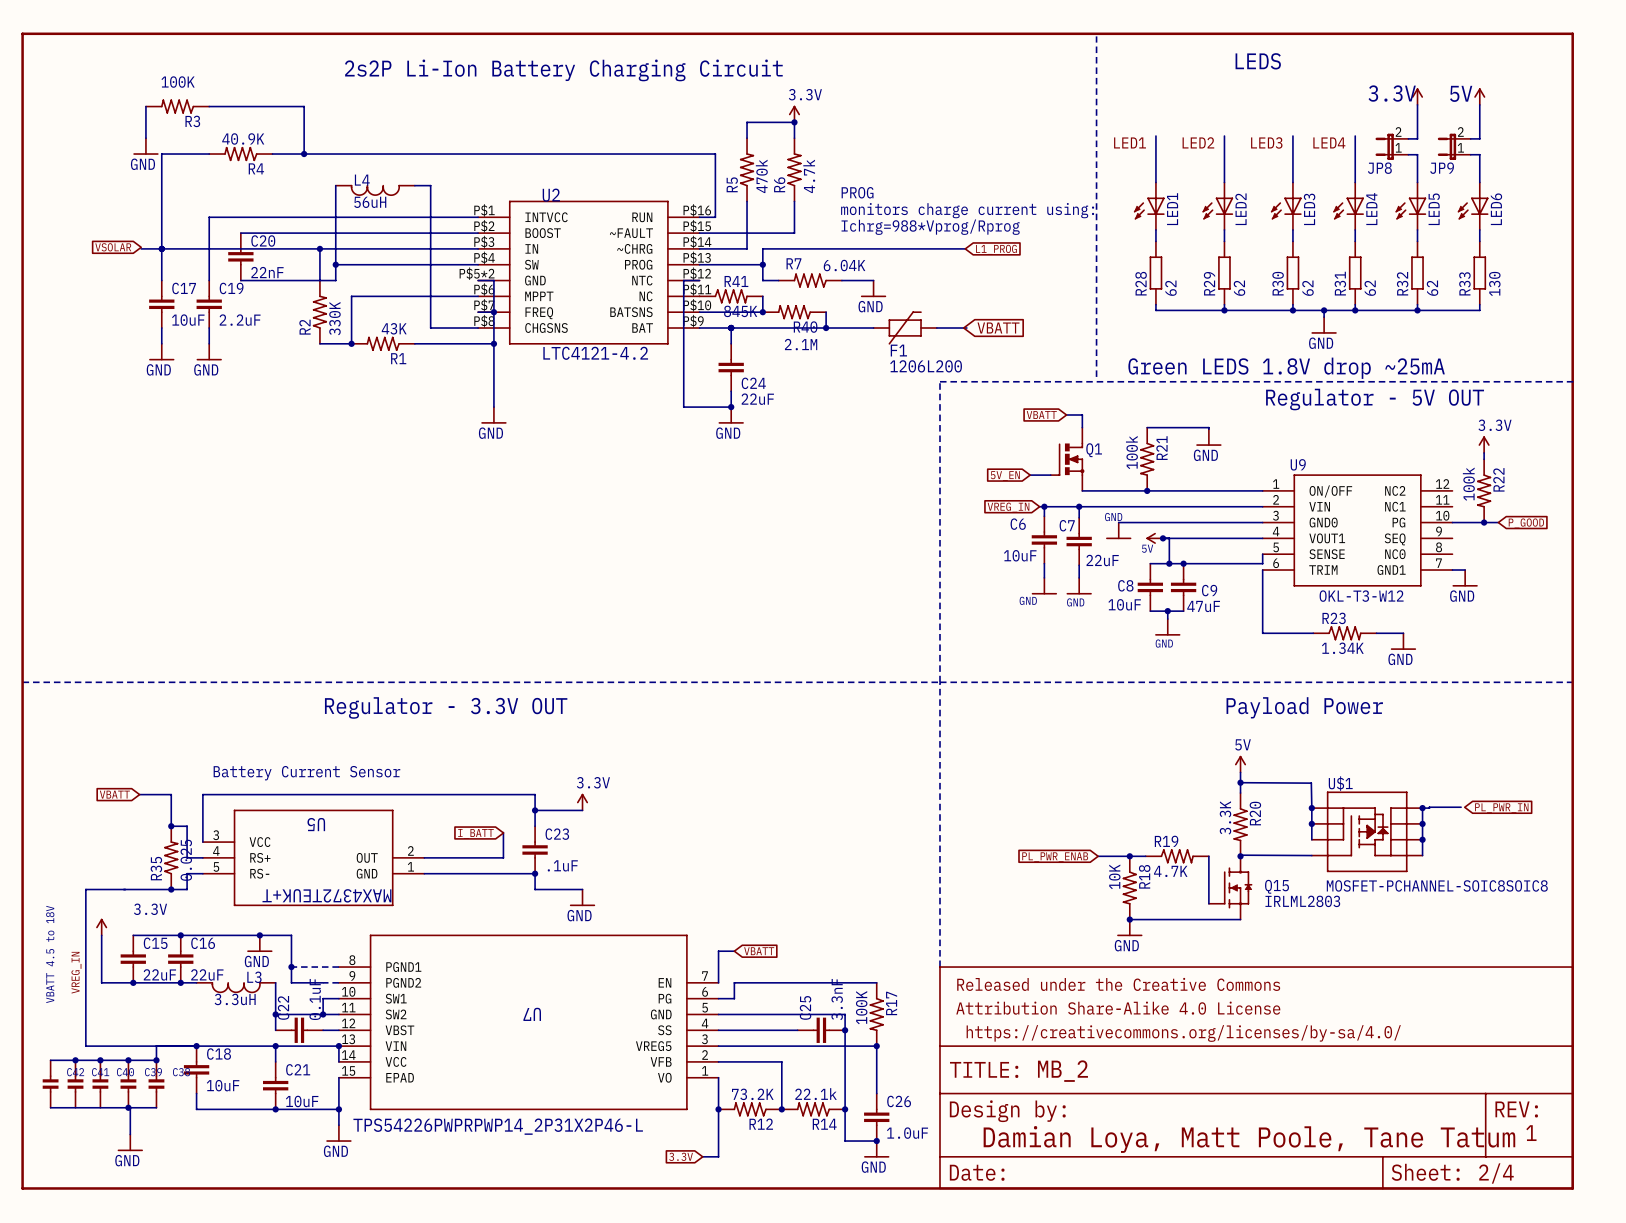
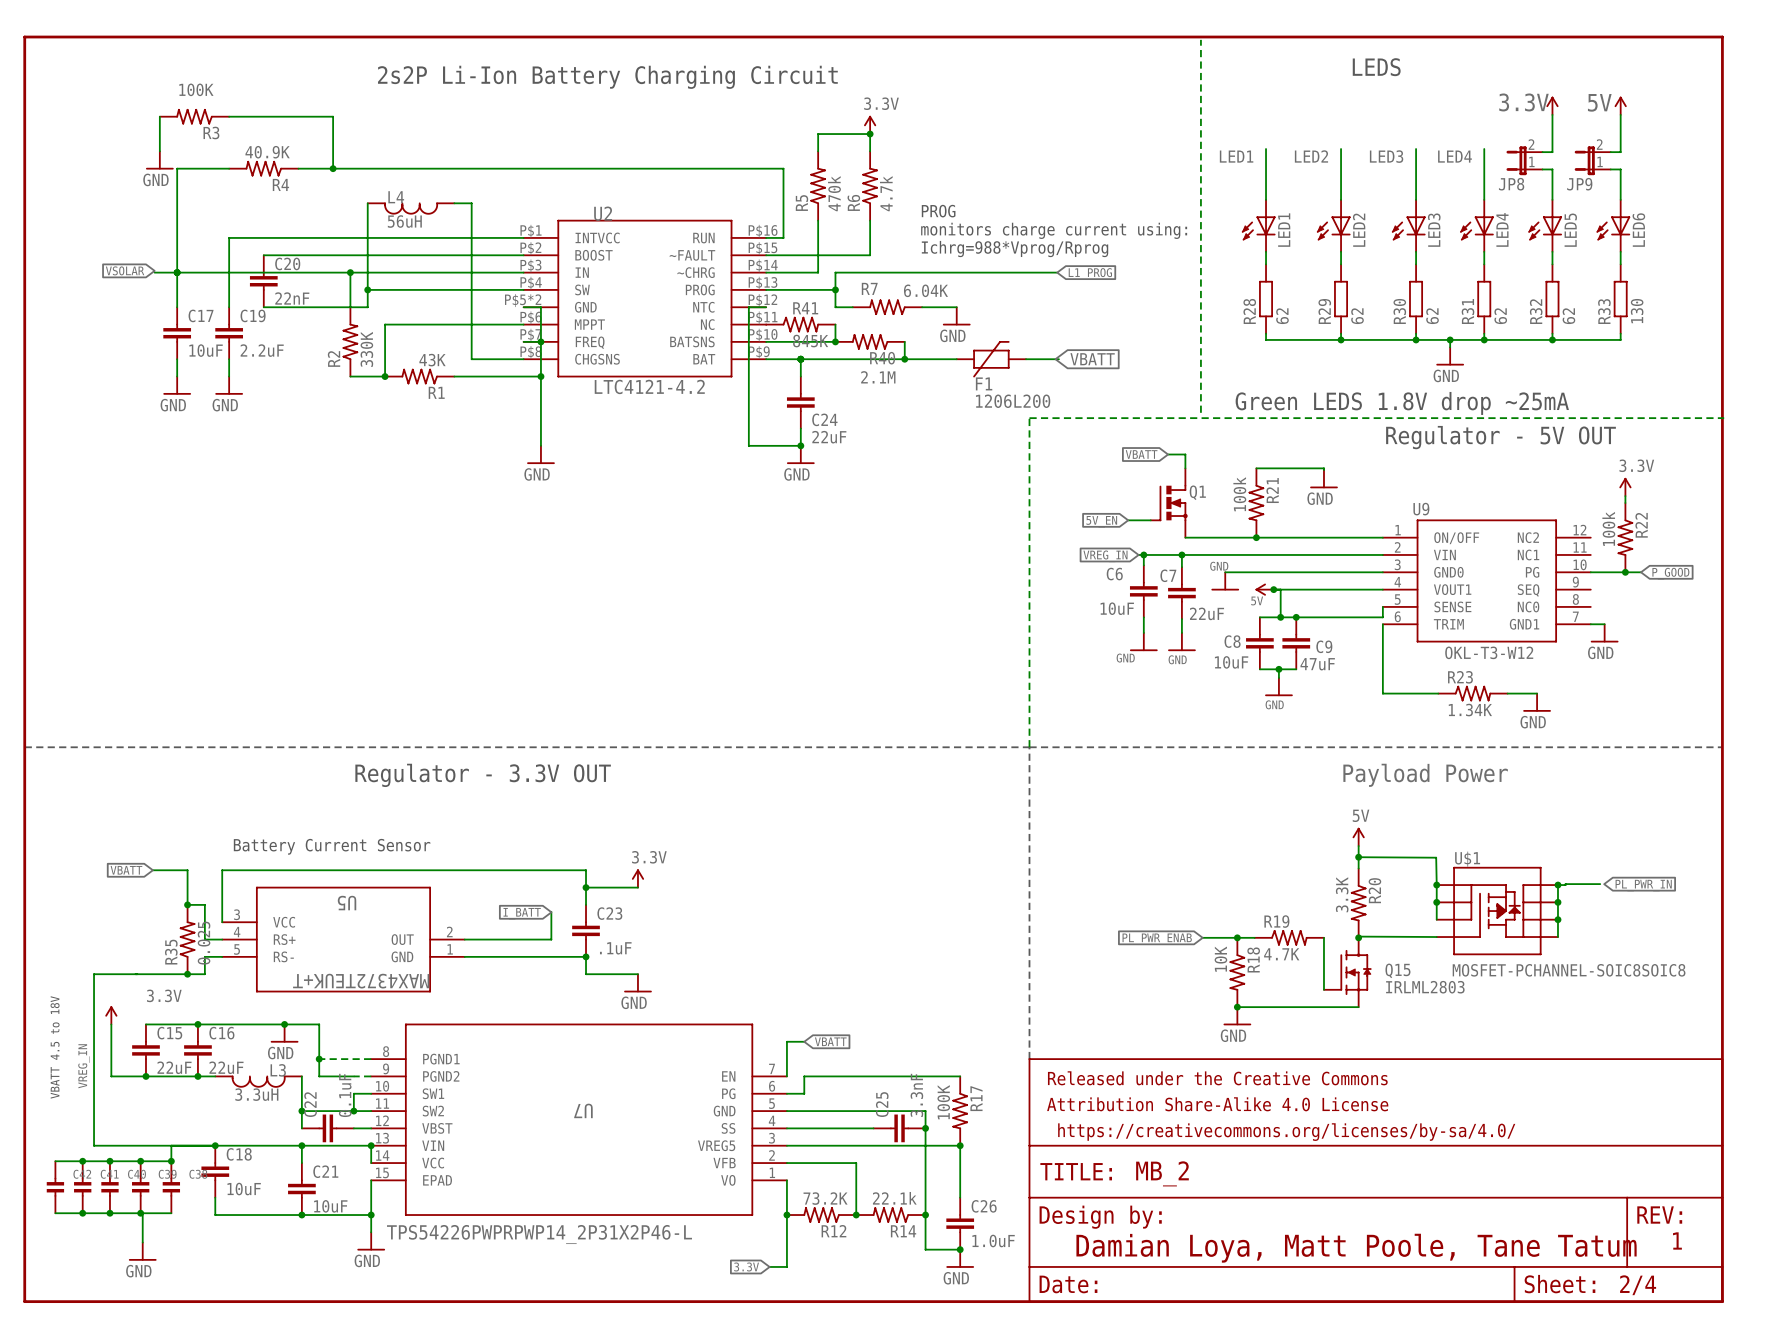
junction: none -> (82, 1213)
junction: none -> (109, 1213)

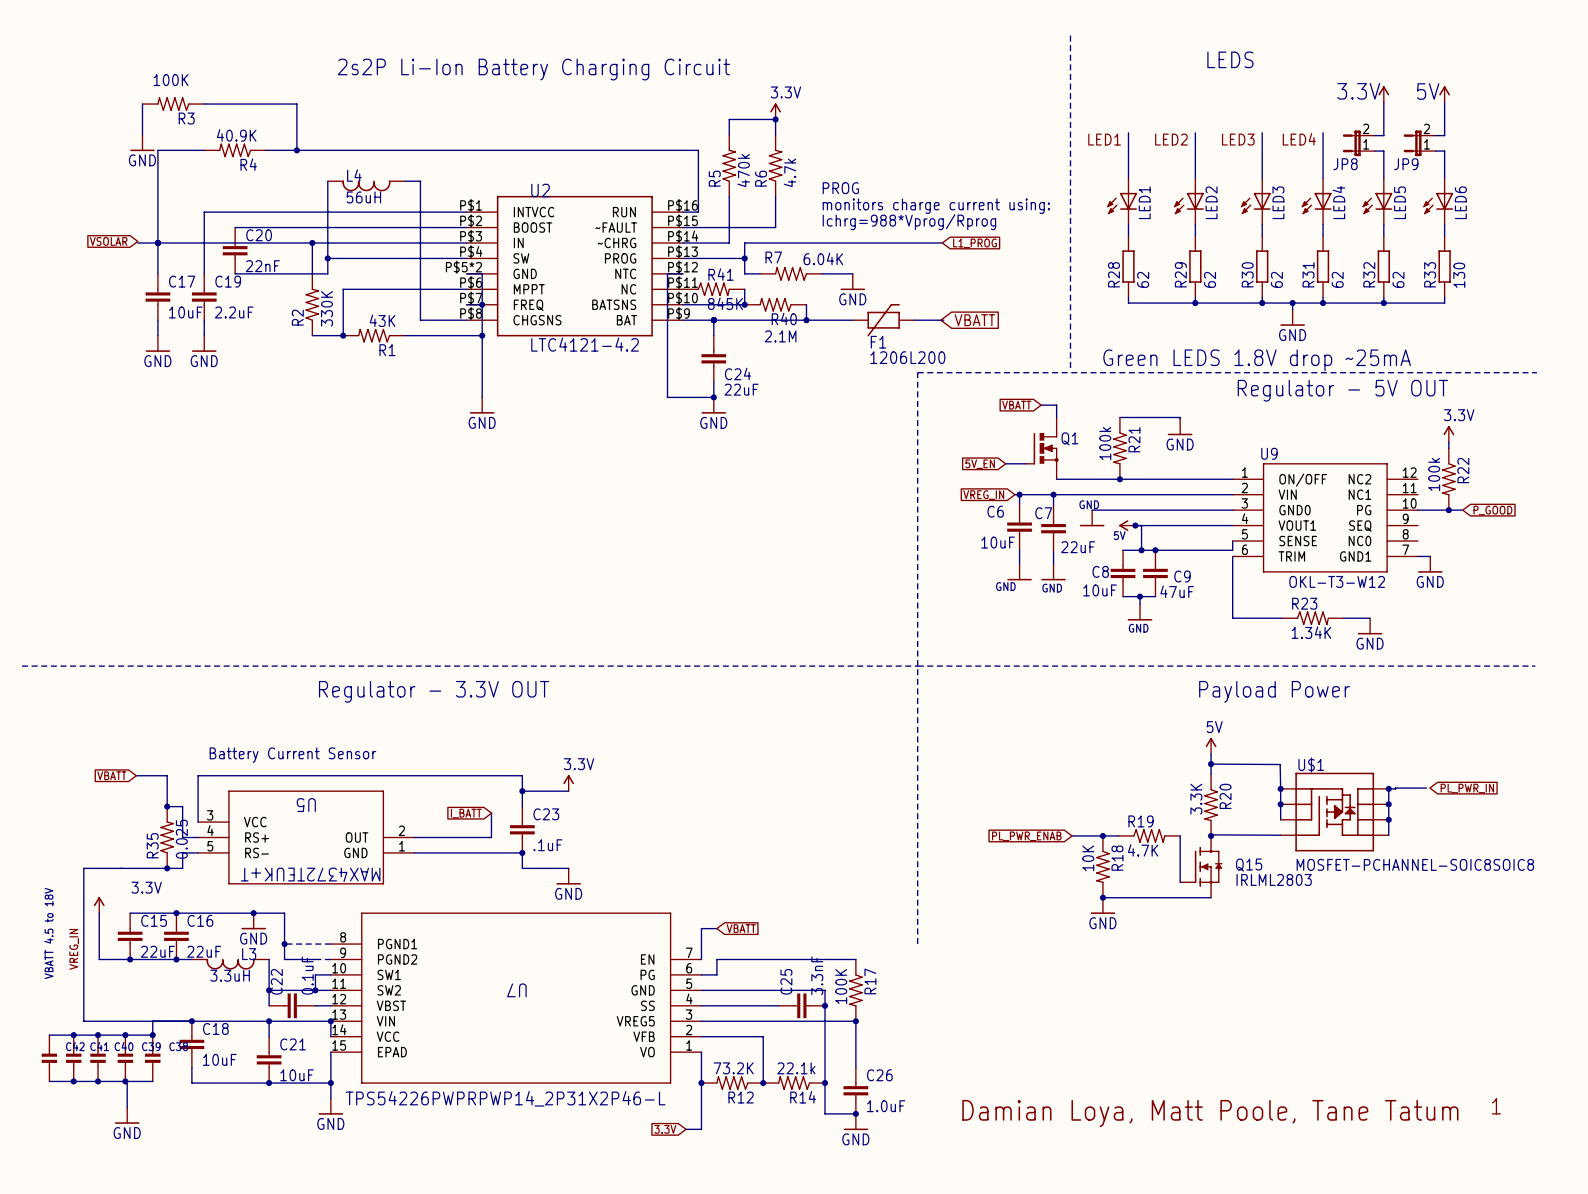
part: (873, 669) -> none
part: (1375, 1180) -> none

